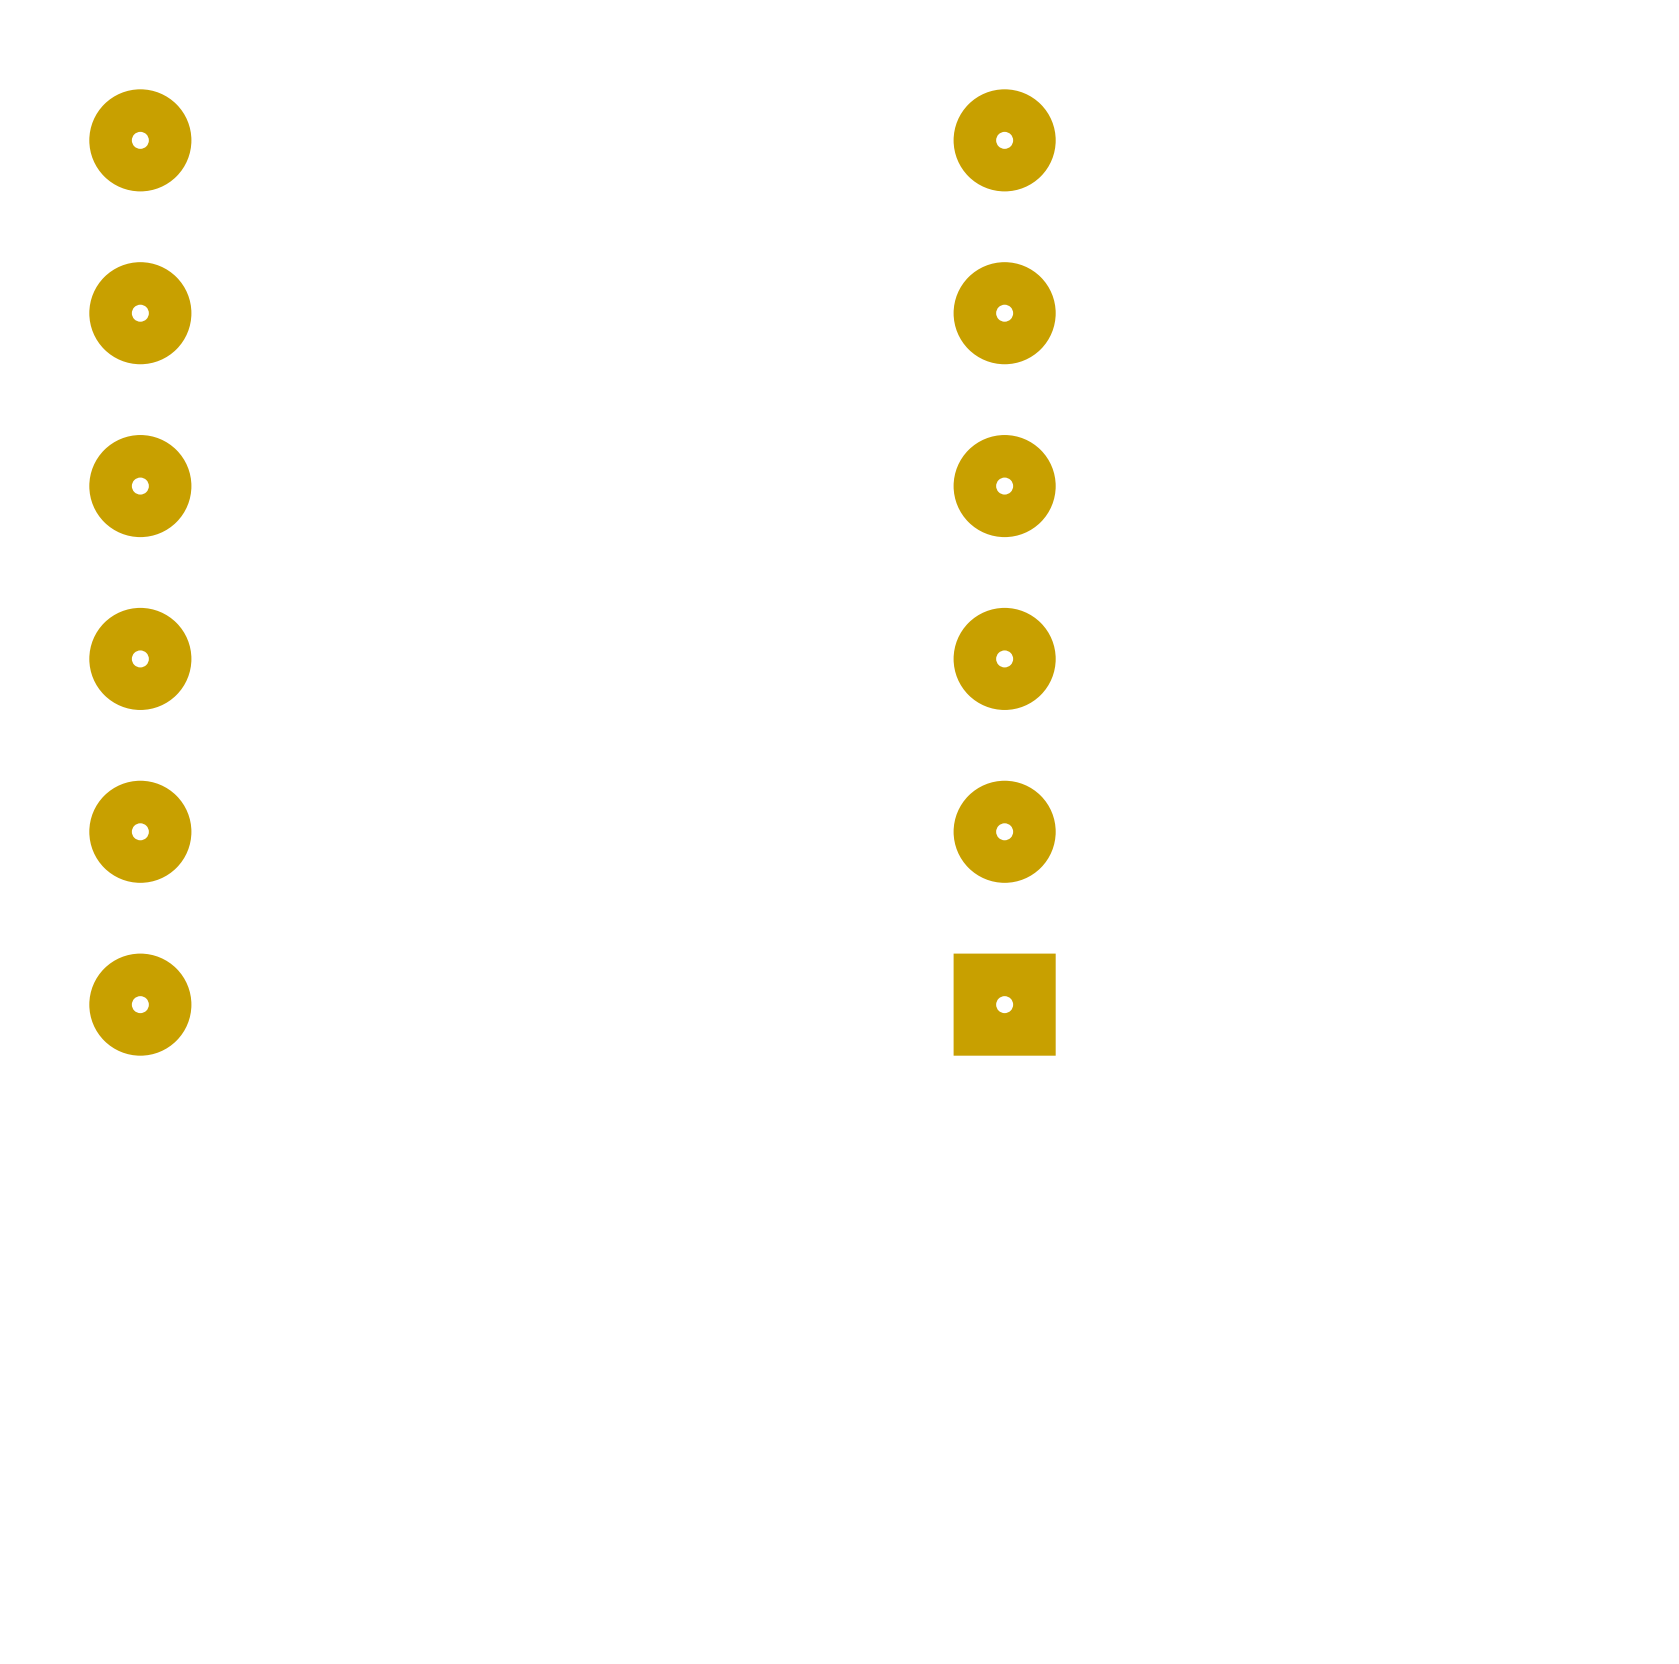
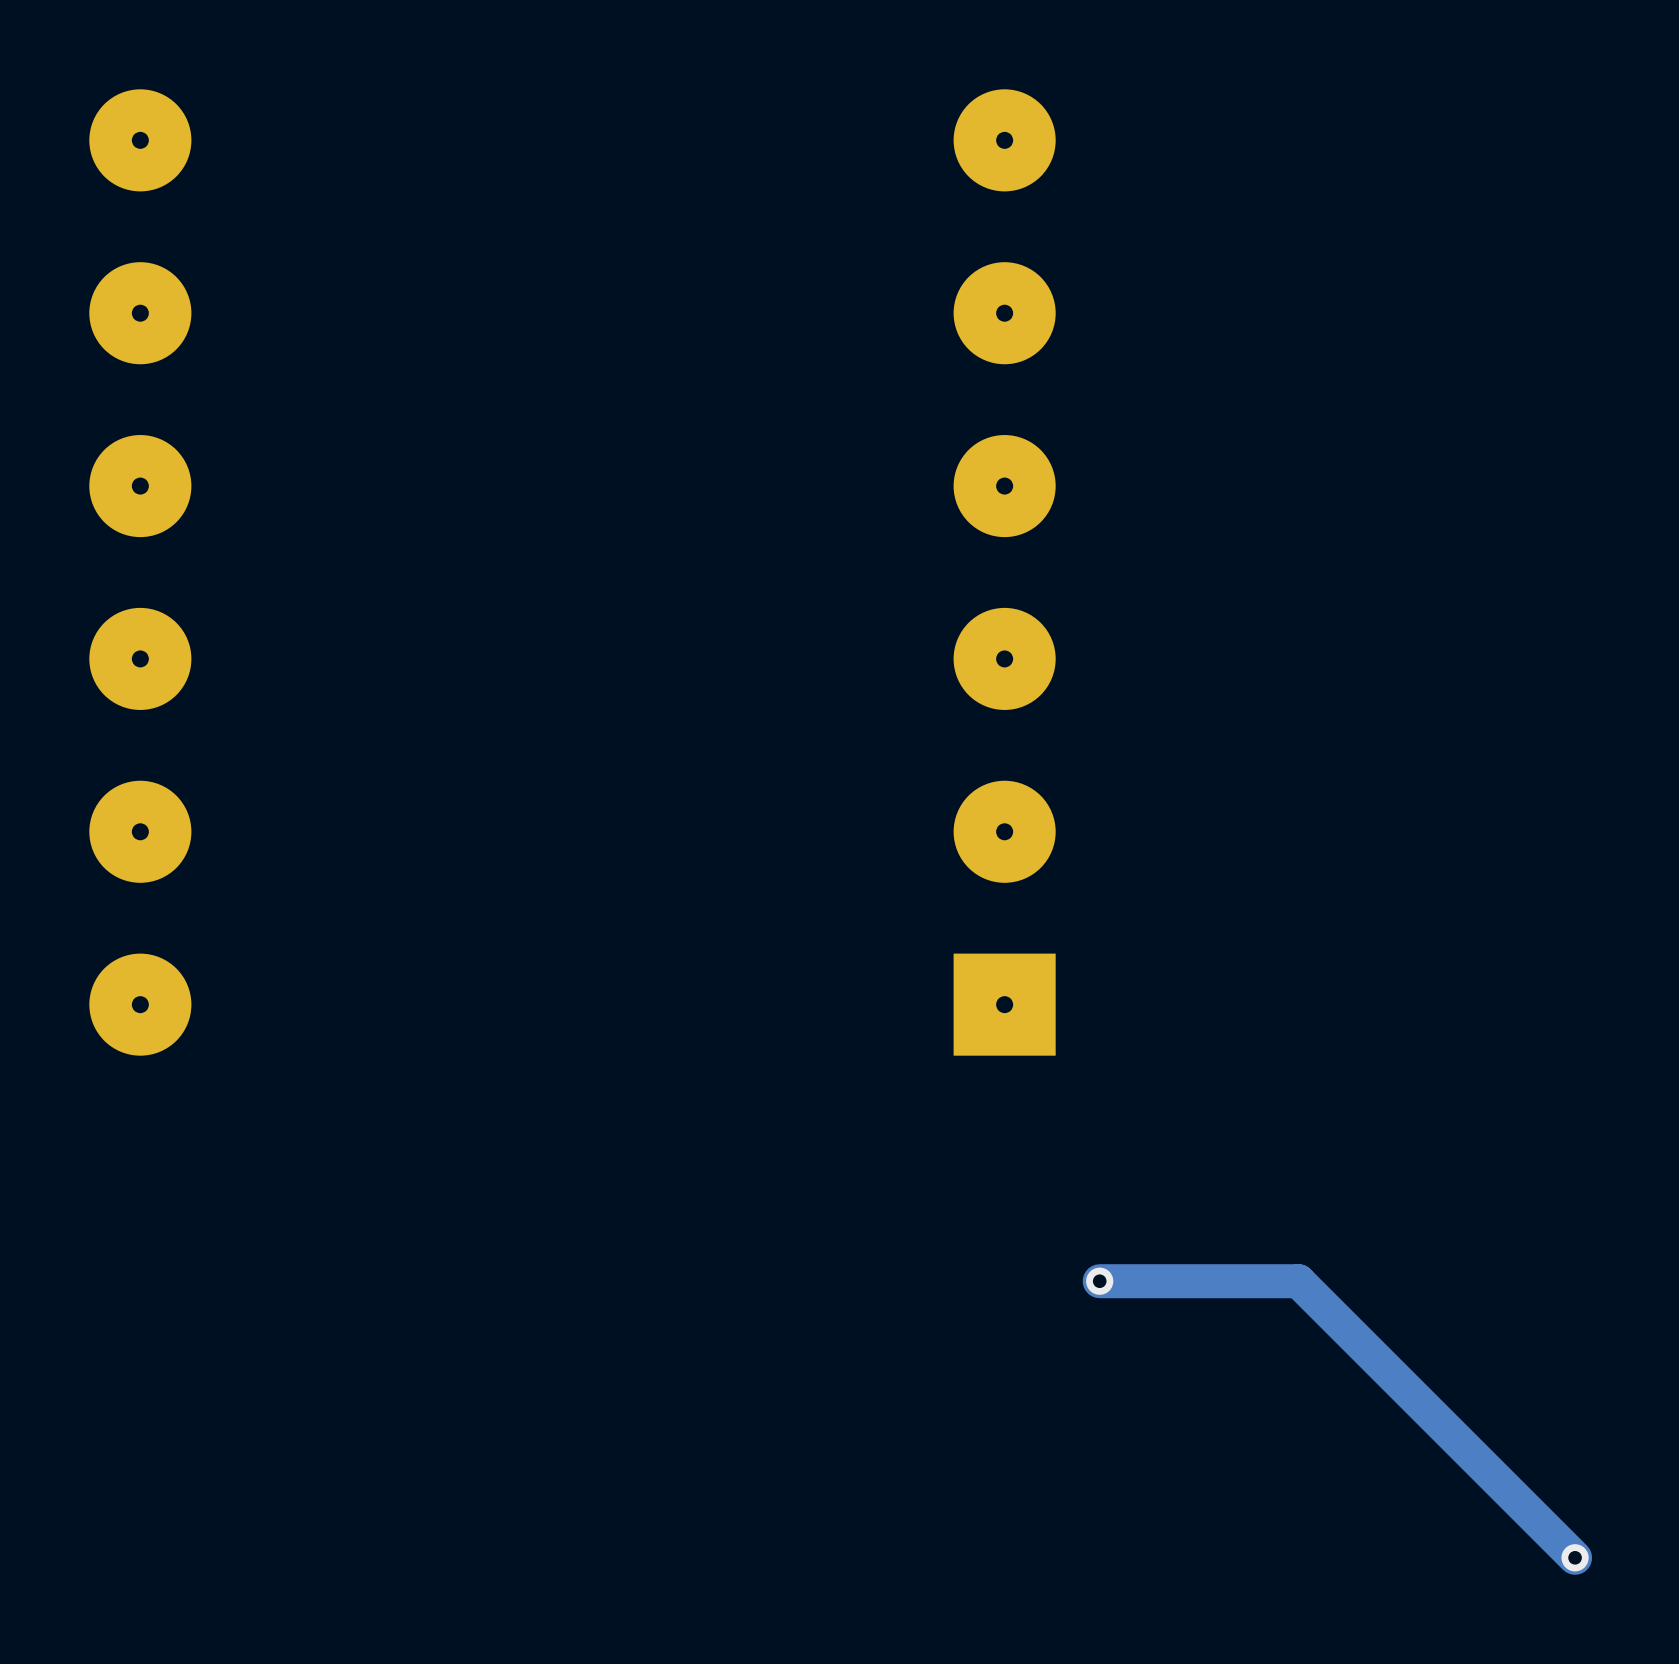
track: none -> (1099, 1281) (1298, 1281) (1575, 1557)
via: none -> (1099, 1281)
via: none -> (1575, 1557)

